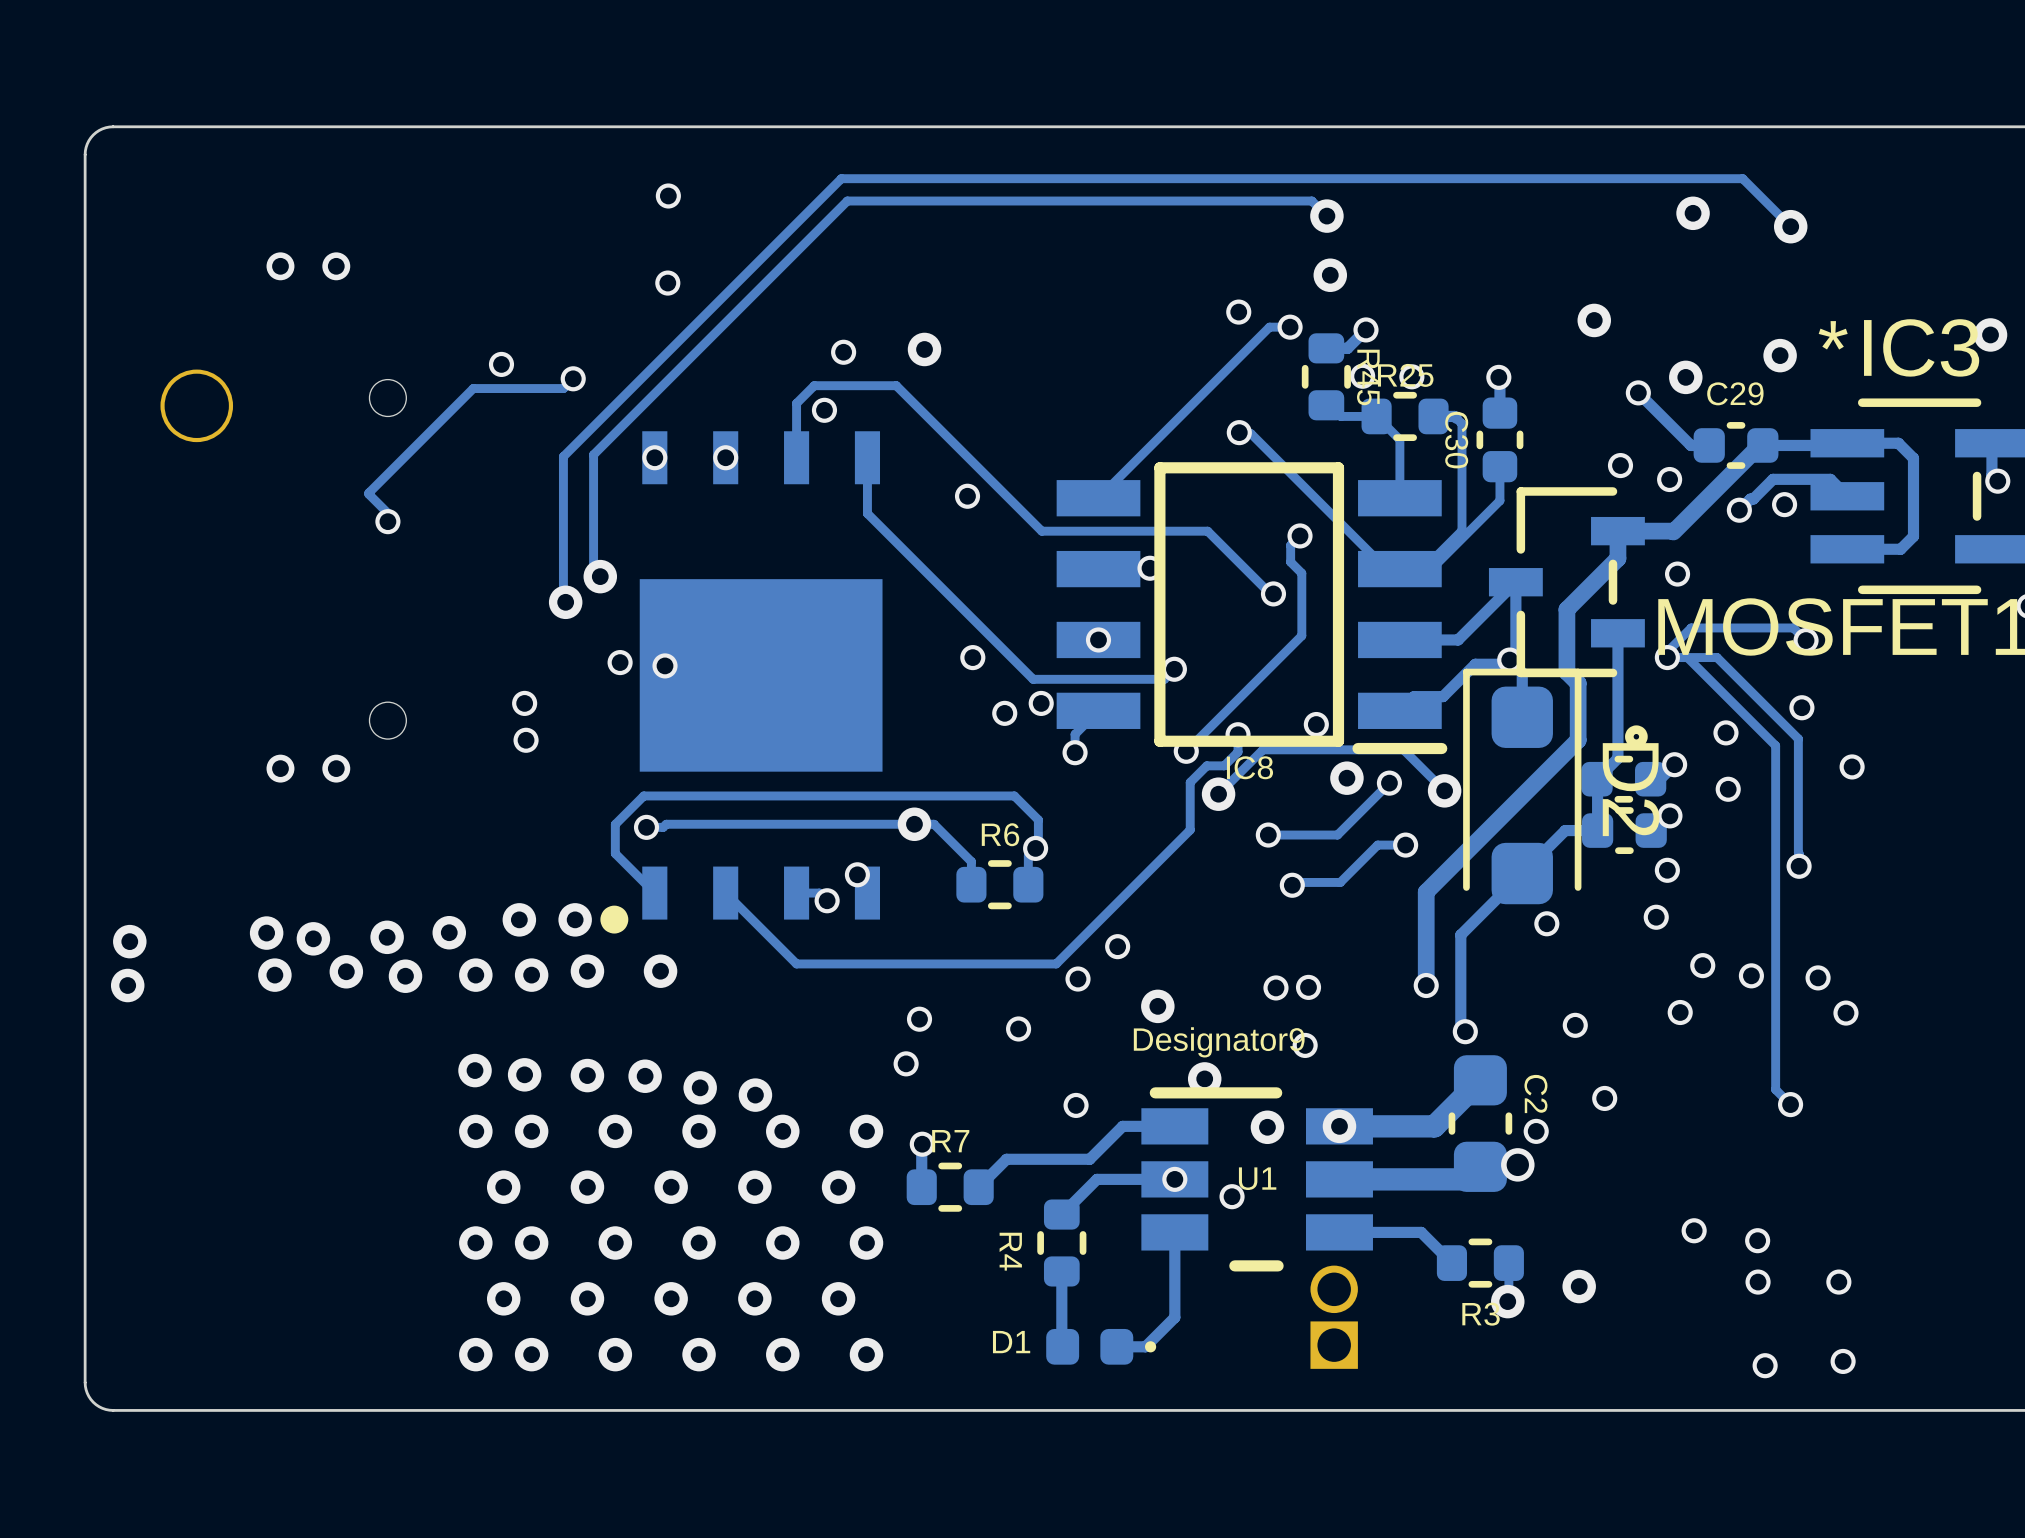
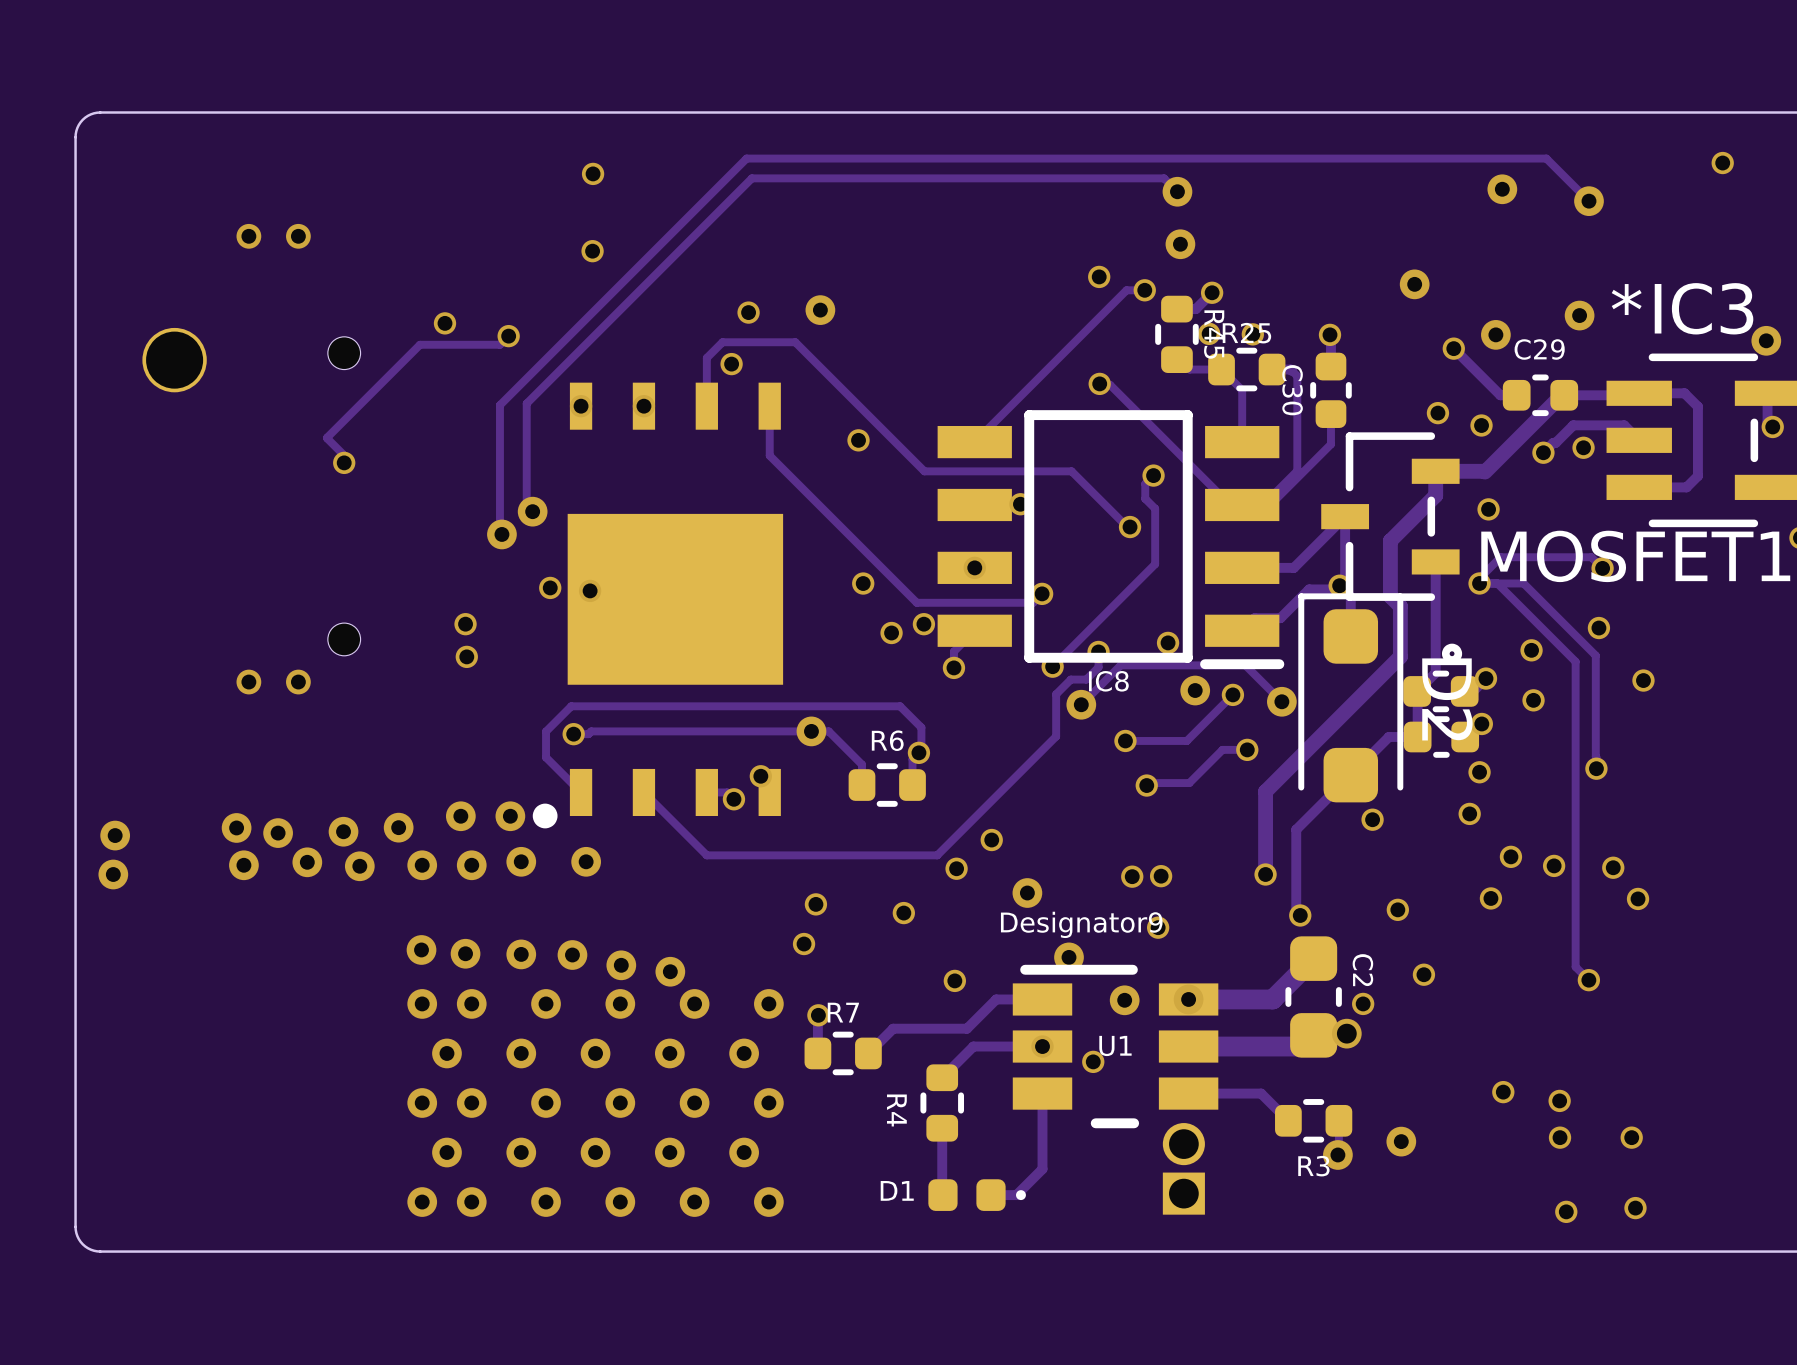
via: none -> (1722, 163)
via position: (1990, 334) -> (1766, 340)

